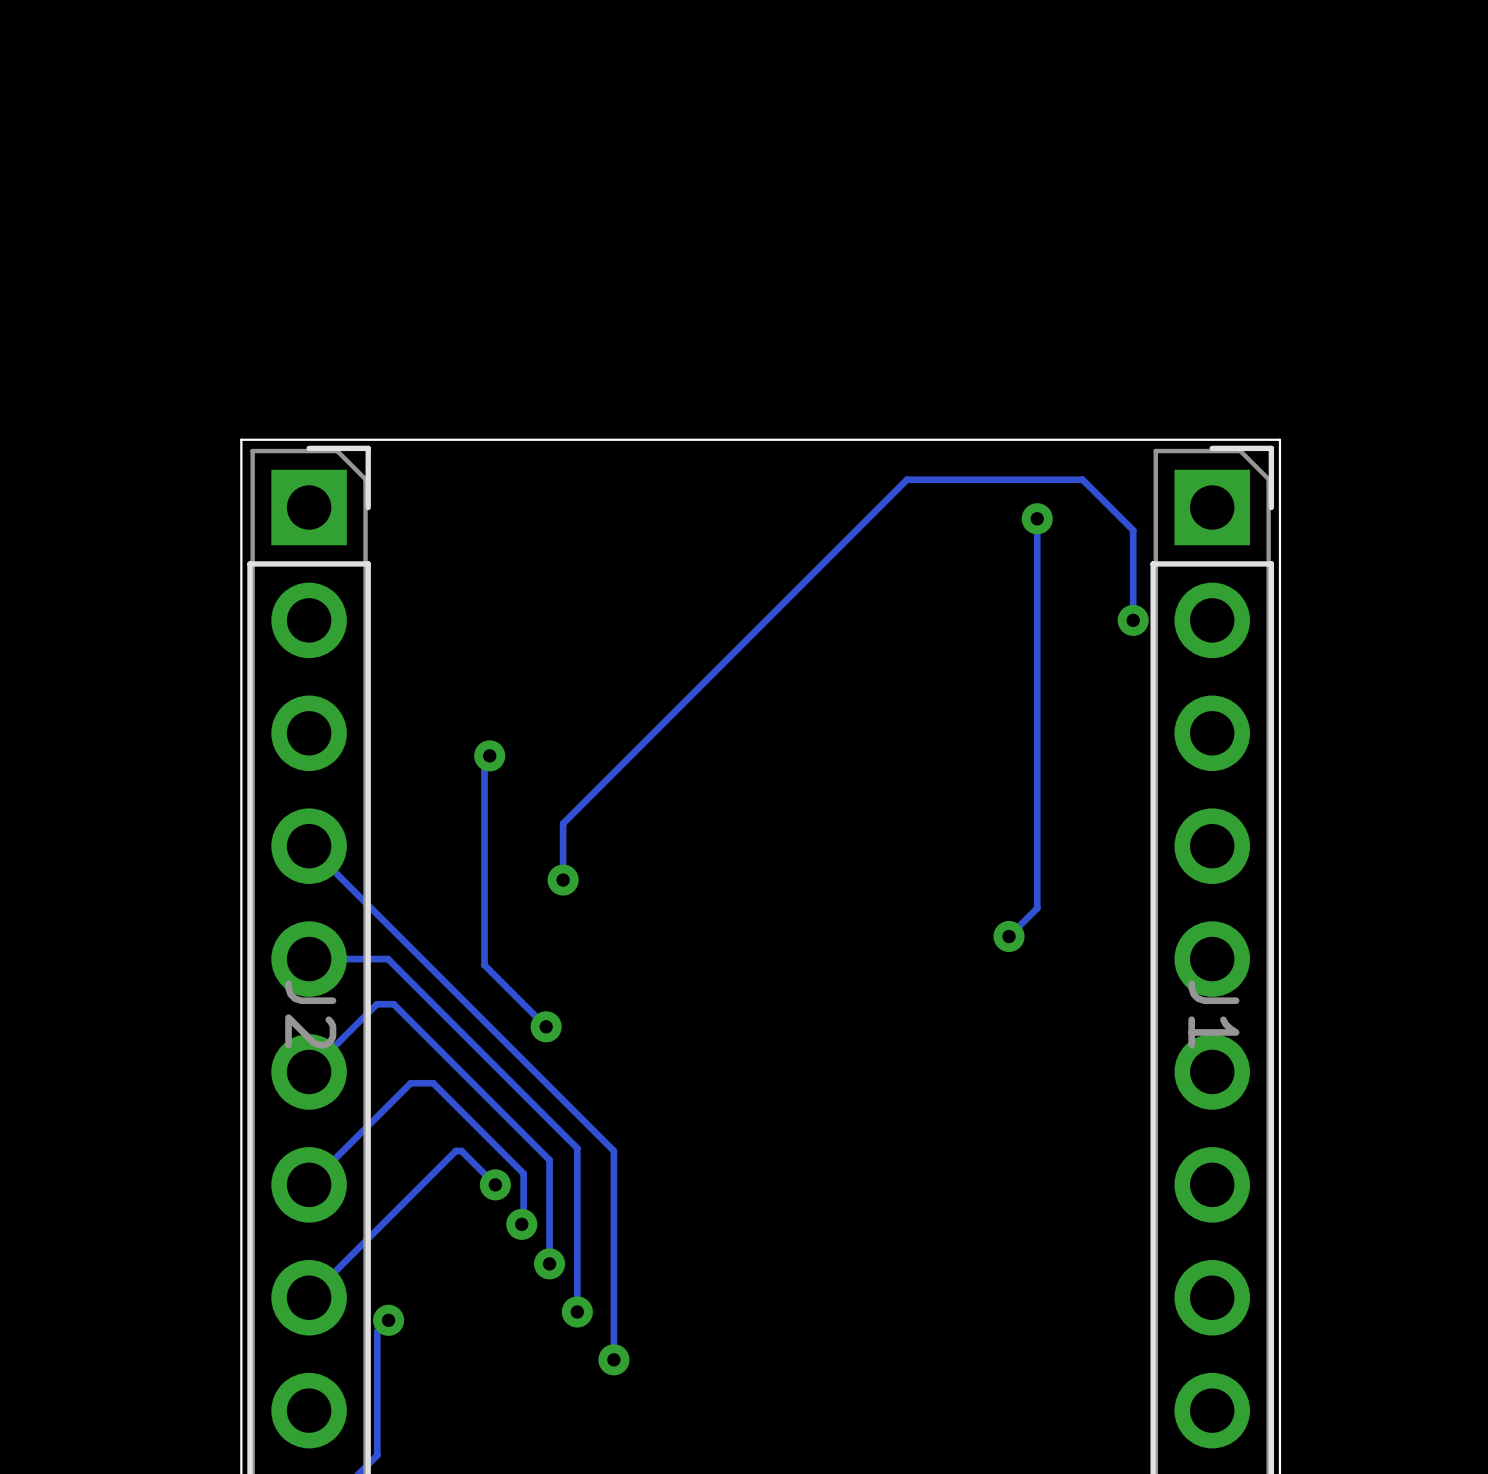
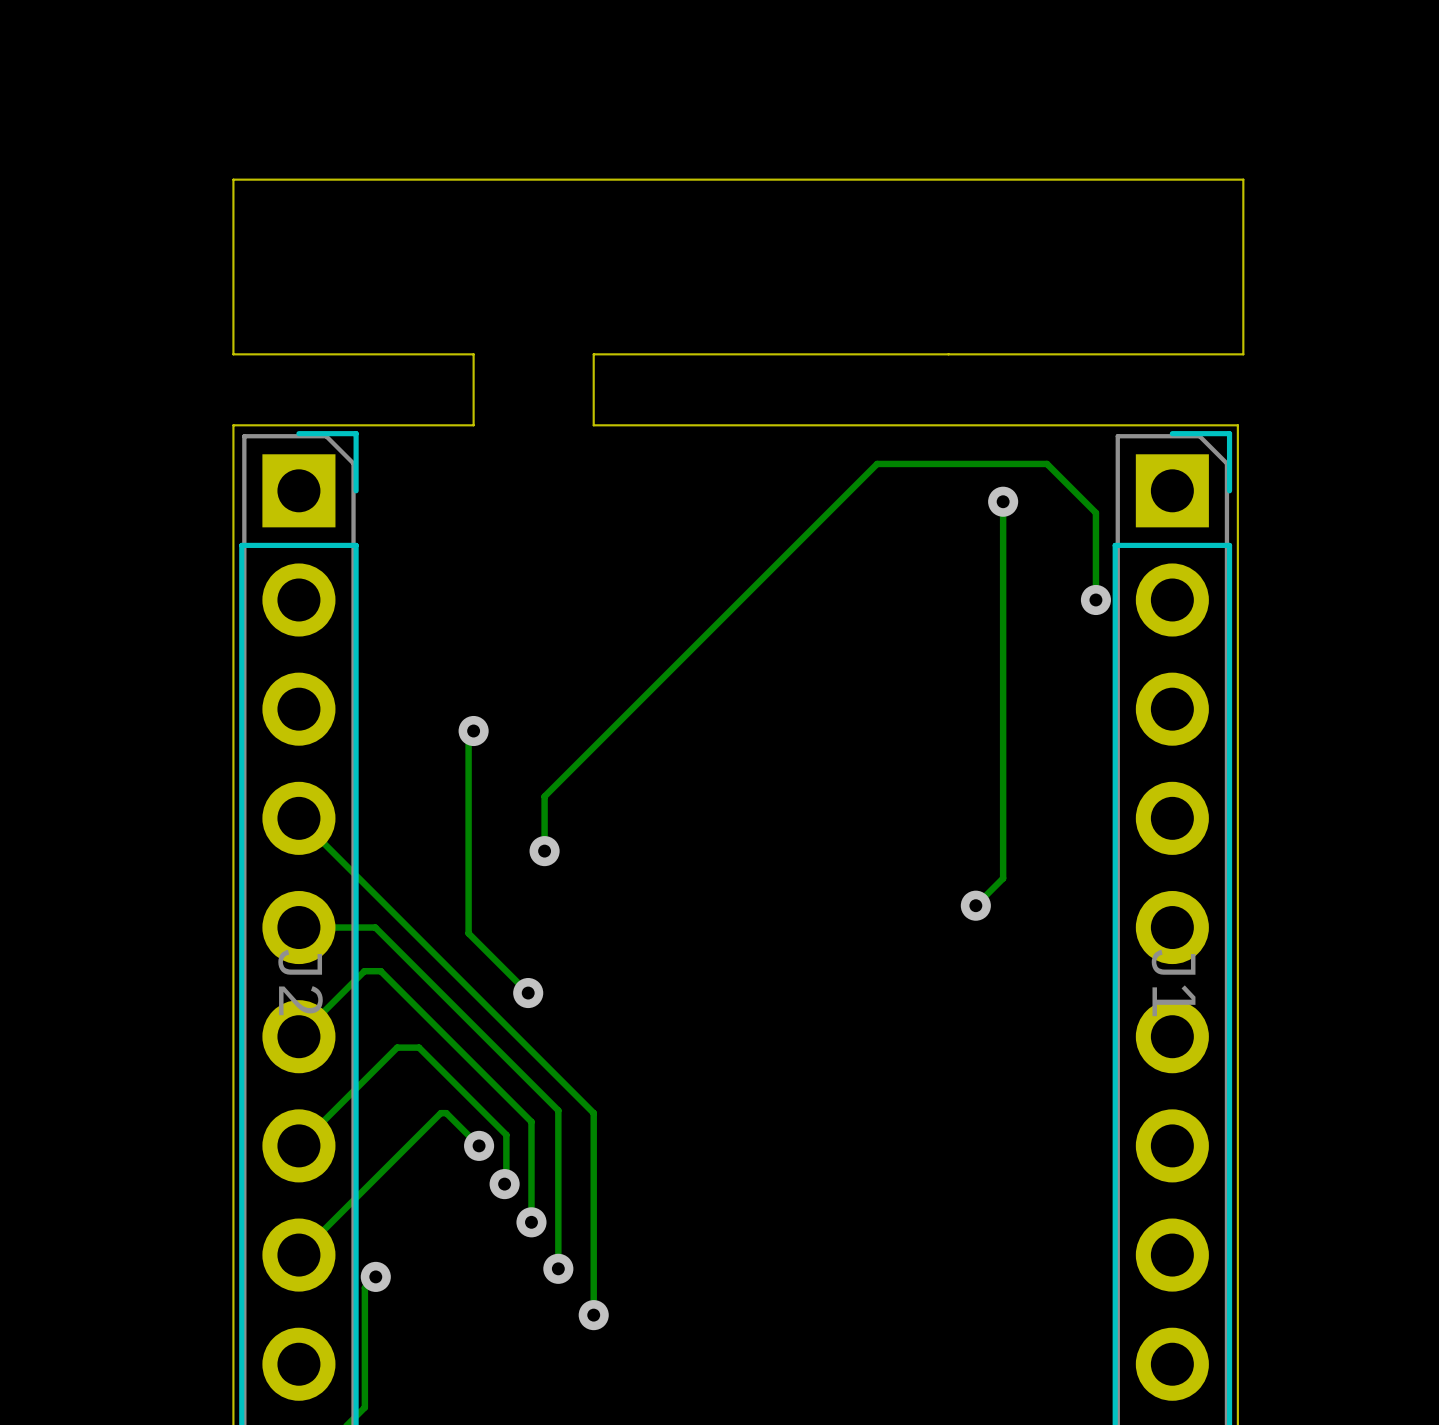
board edge: (613, 439) (489, 439) -> (593, 425) (593, 354) (1243, 354) (1243, 179) (233, 179) (233, 354) (473, 354) (473, 425)

